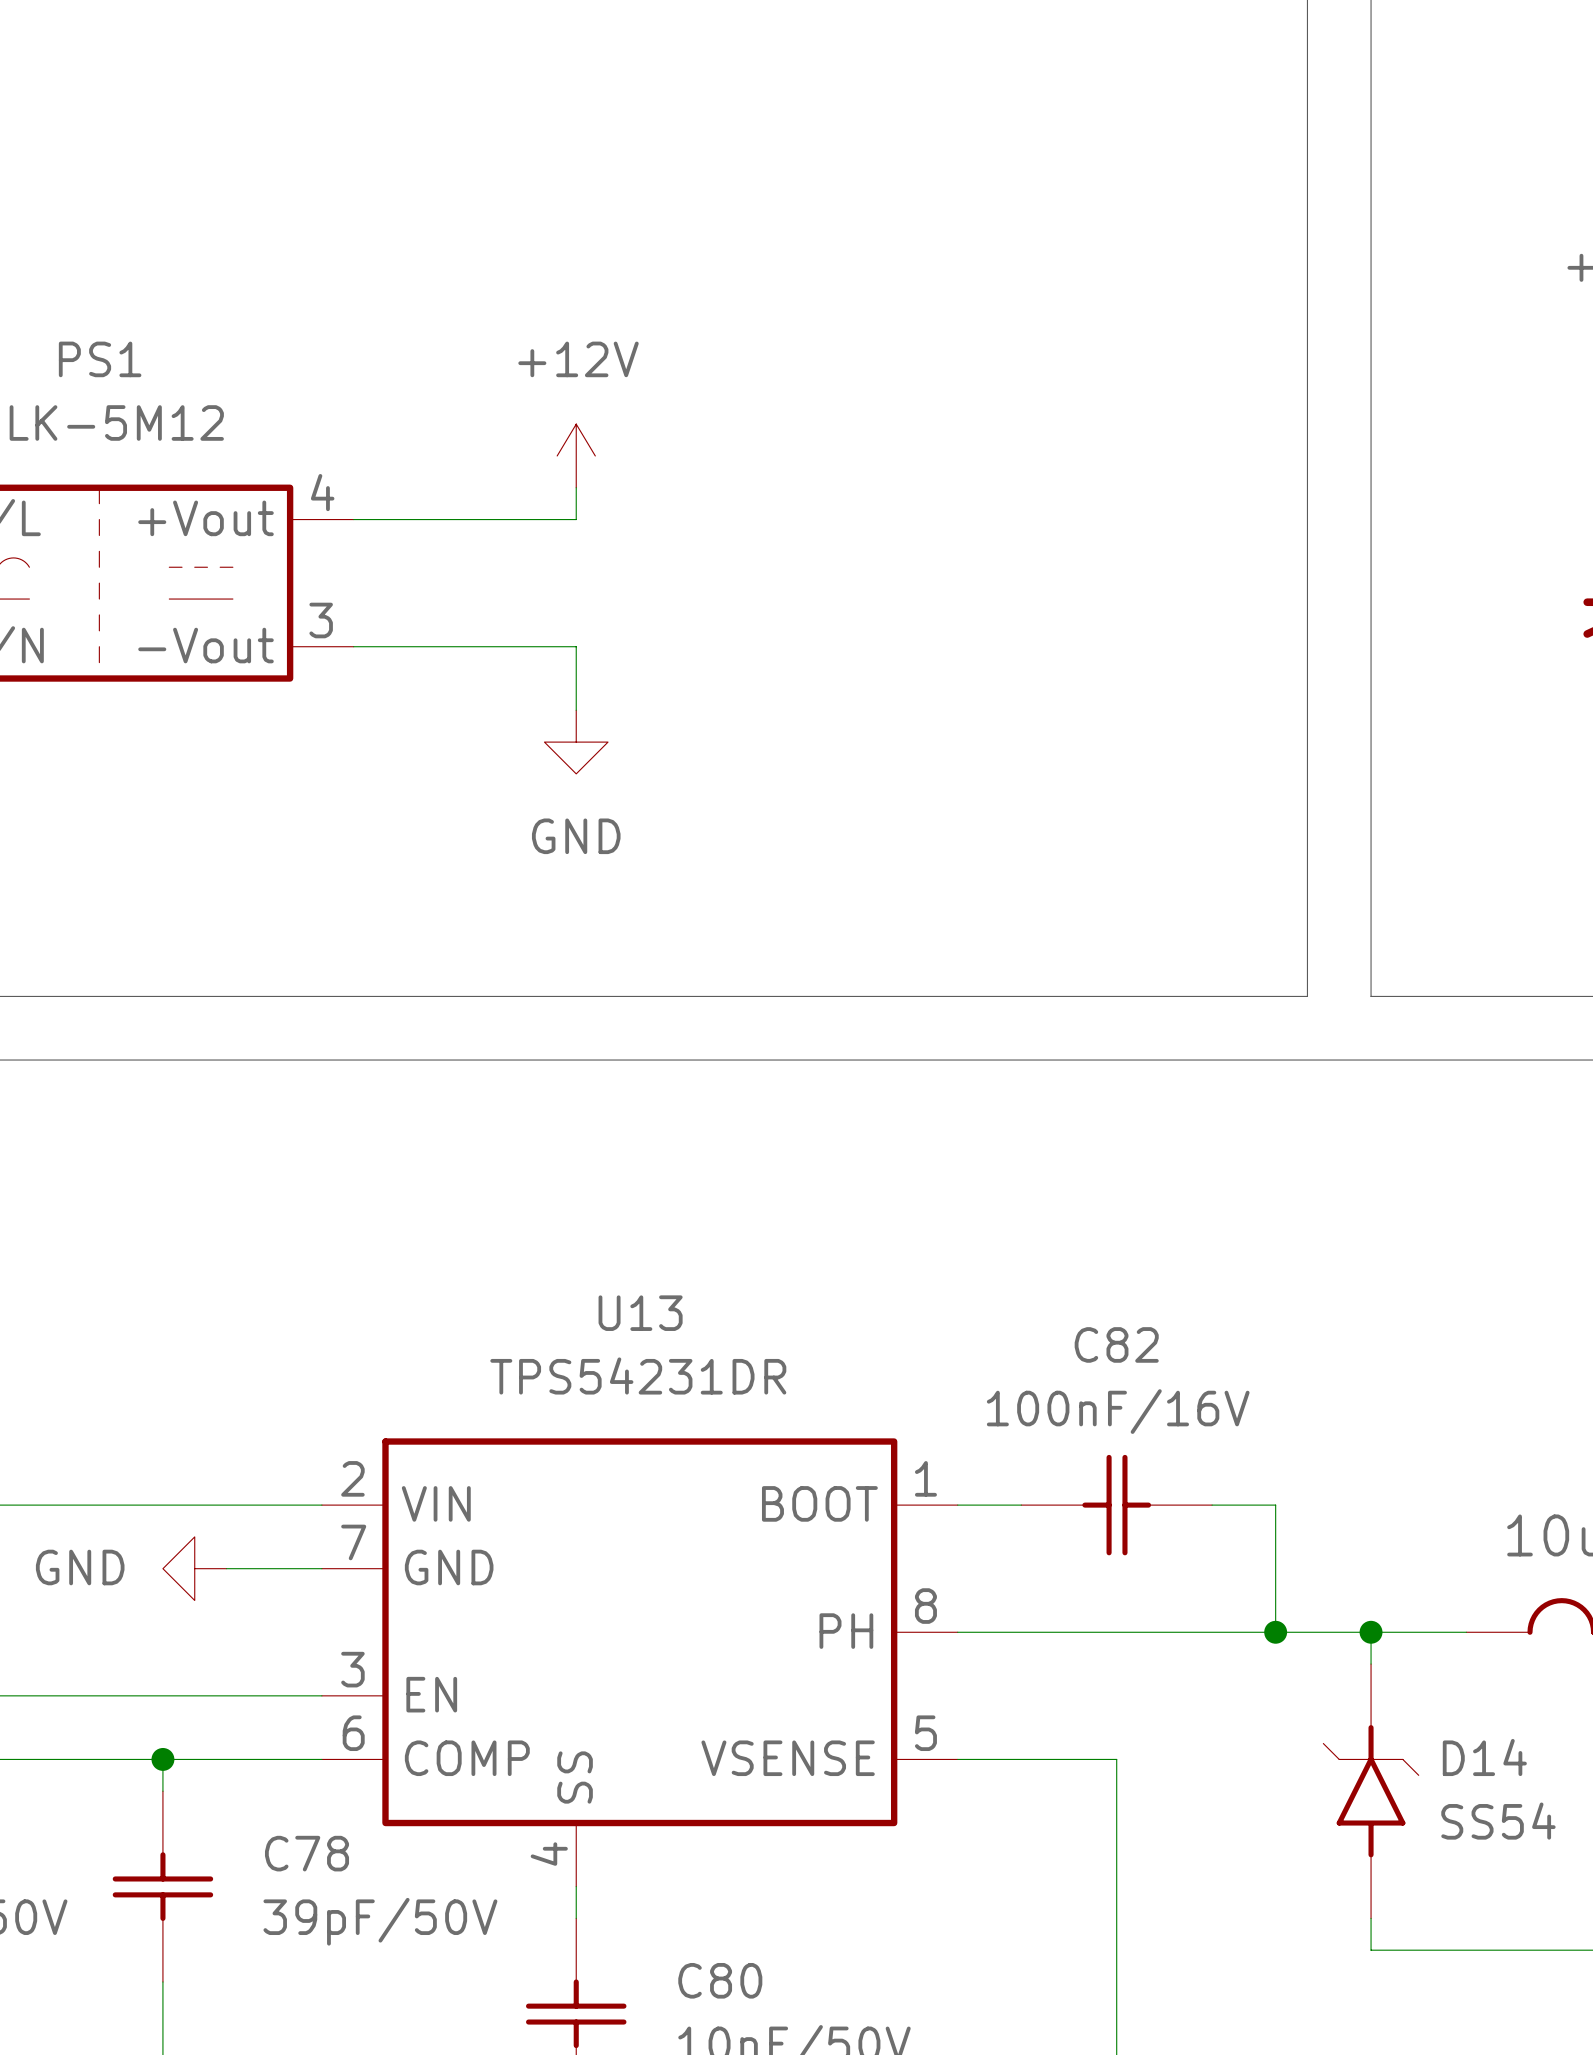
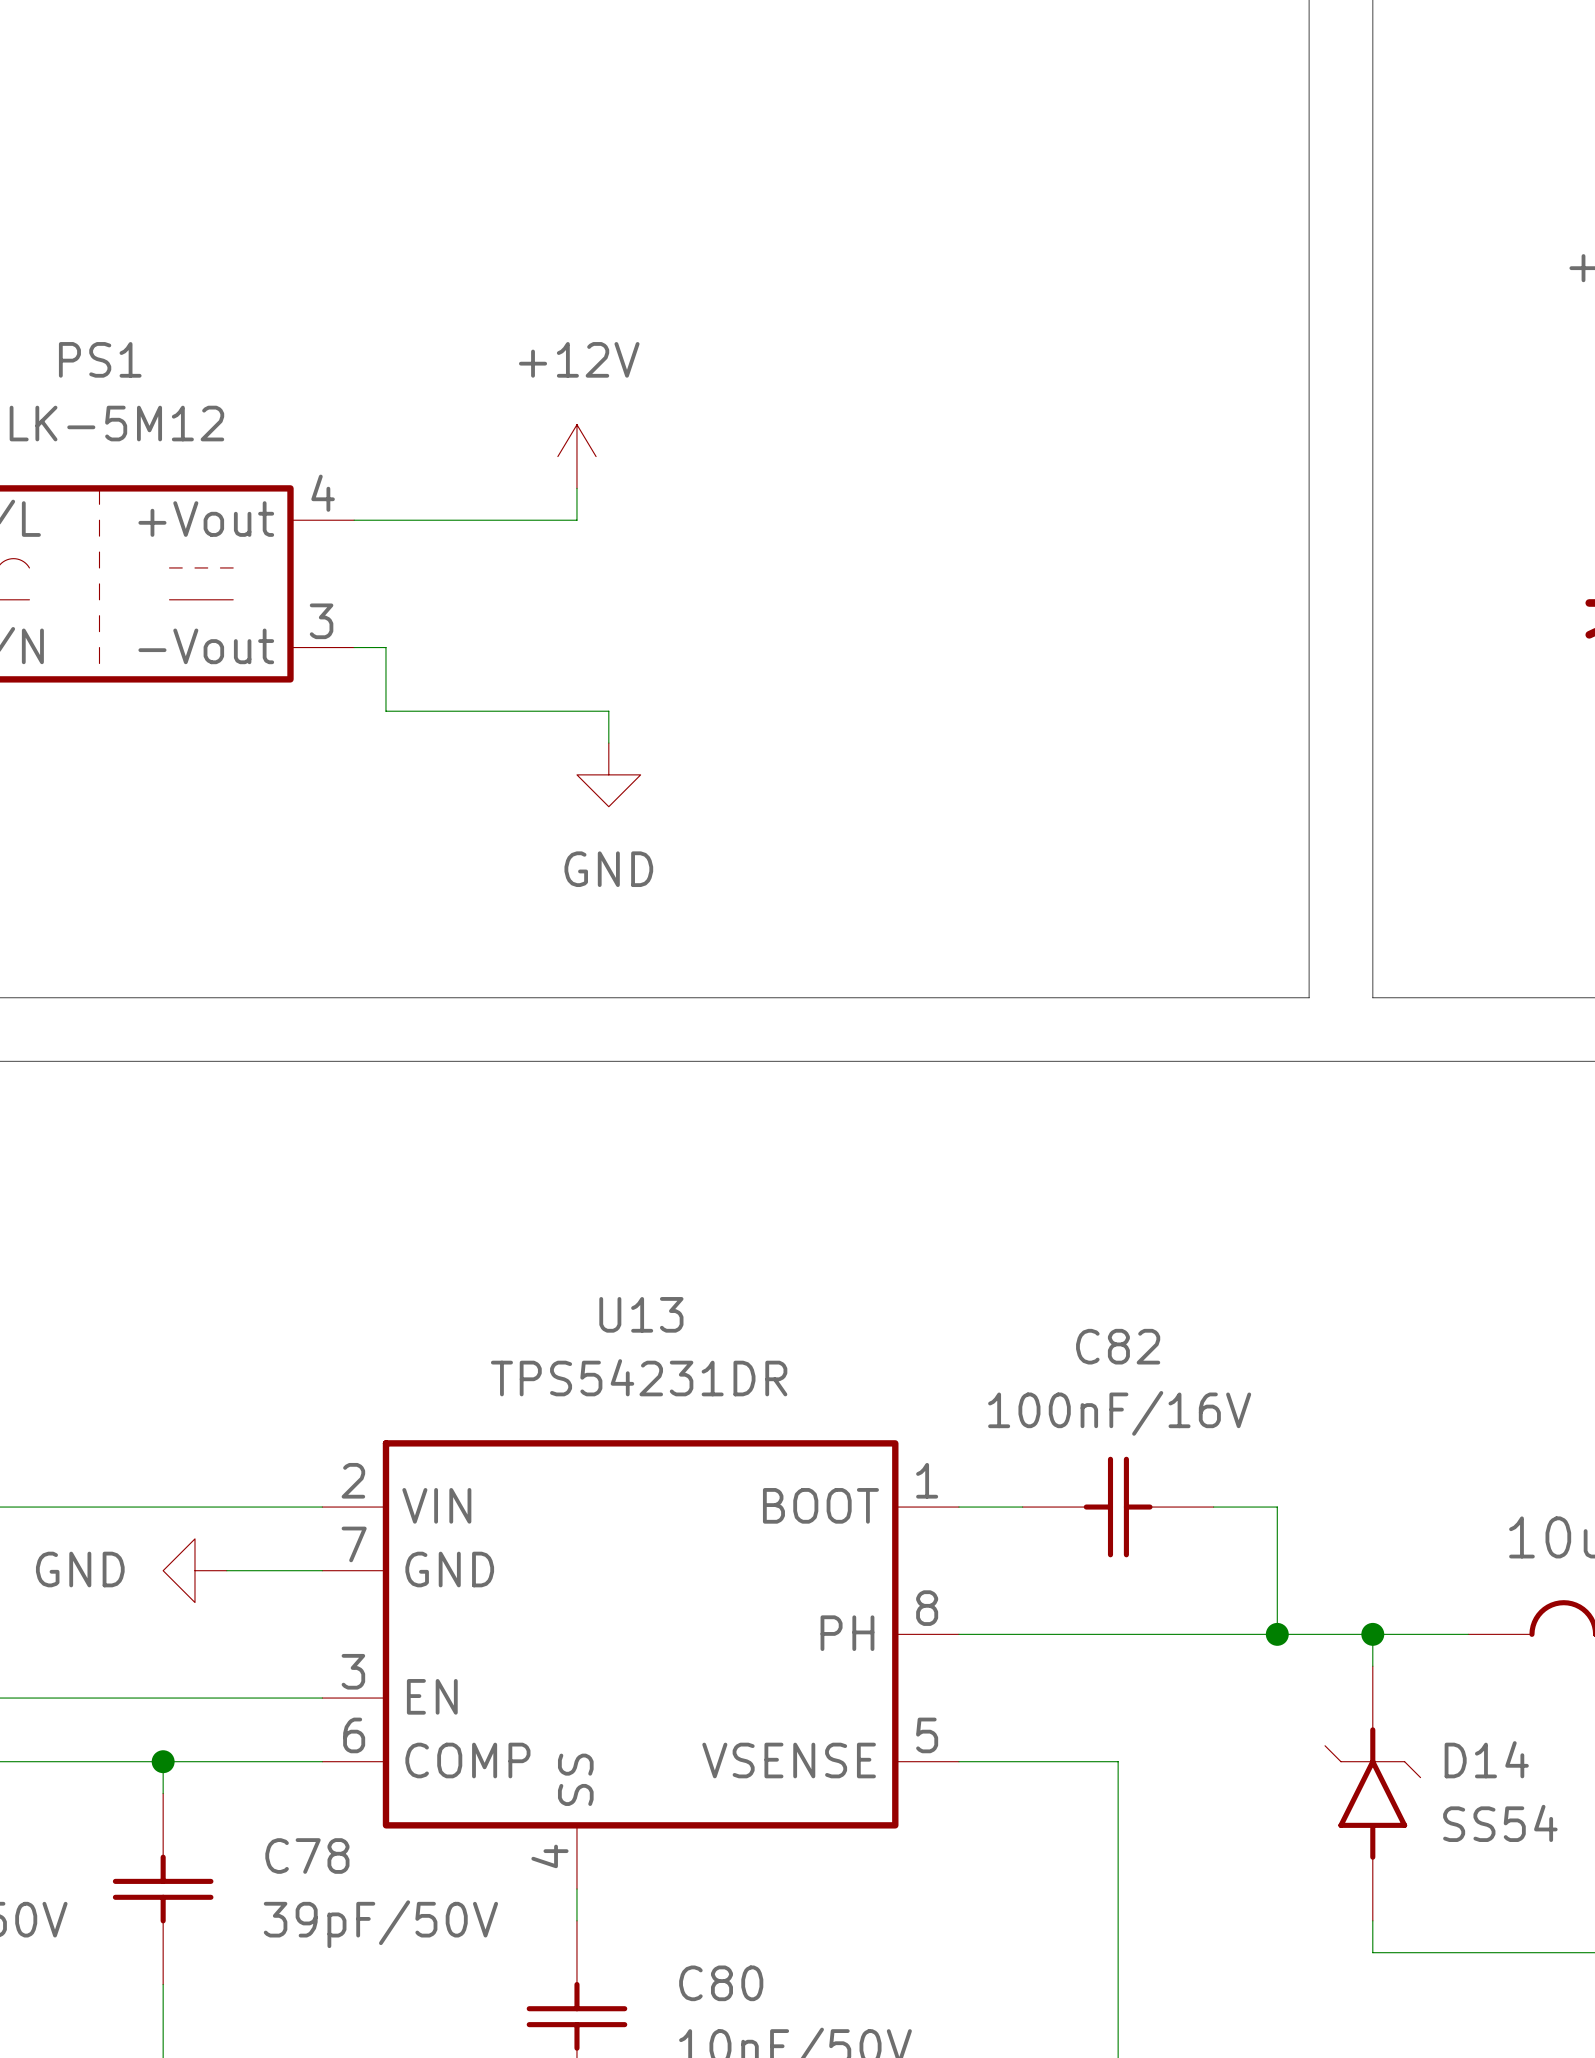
wire: (385, 646) (576, 646) (576, 710) -> (385, 647) (385, 711) (608, 711) (608, 743)
power symbol position: GND (576, 742) -> GND (608, 774)

